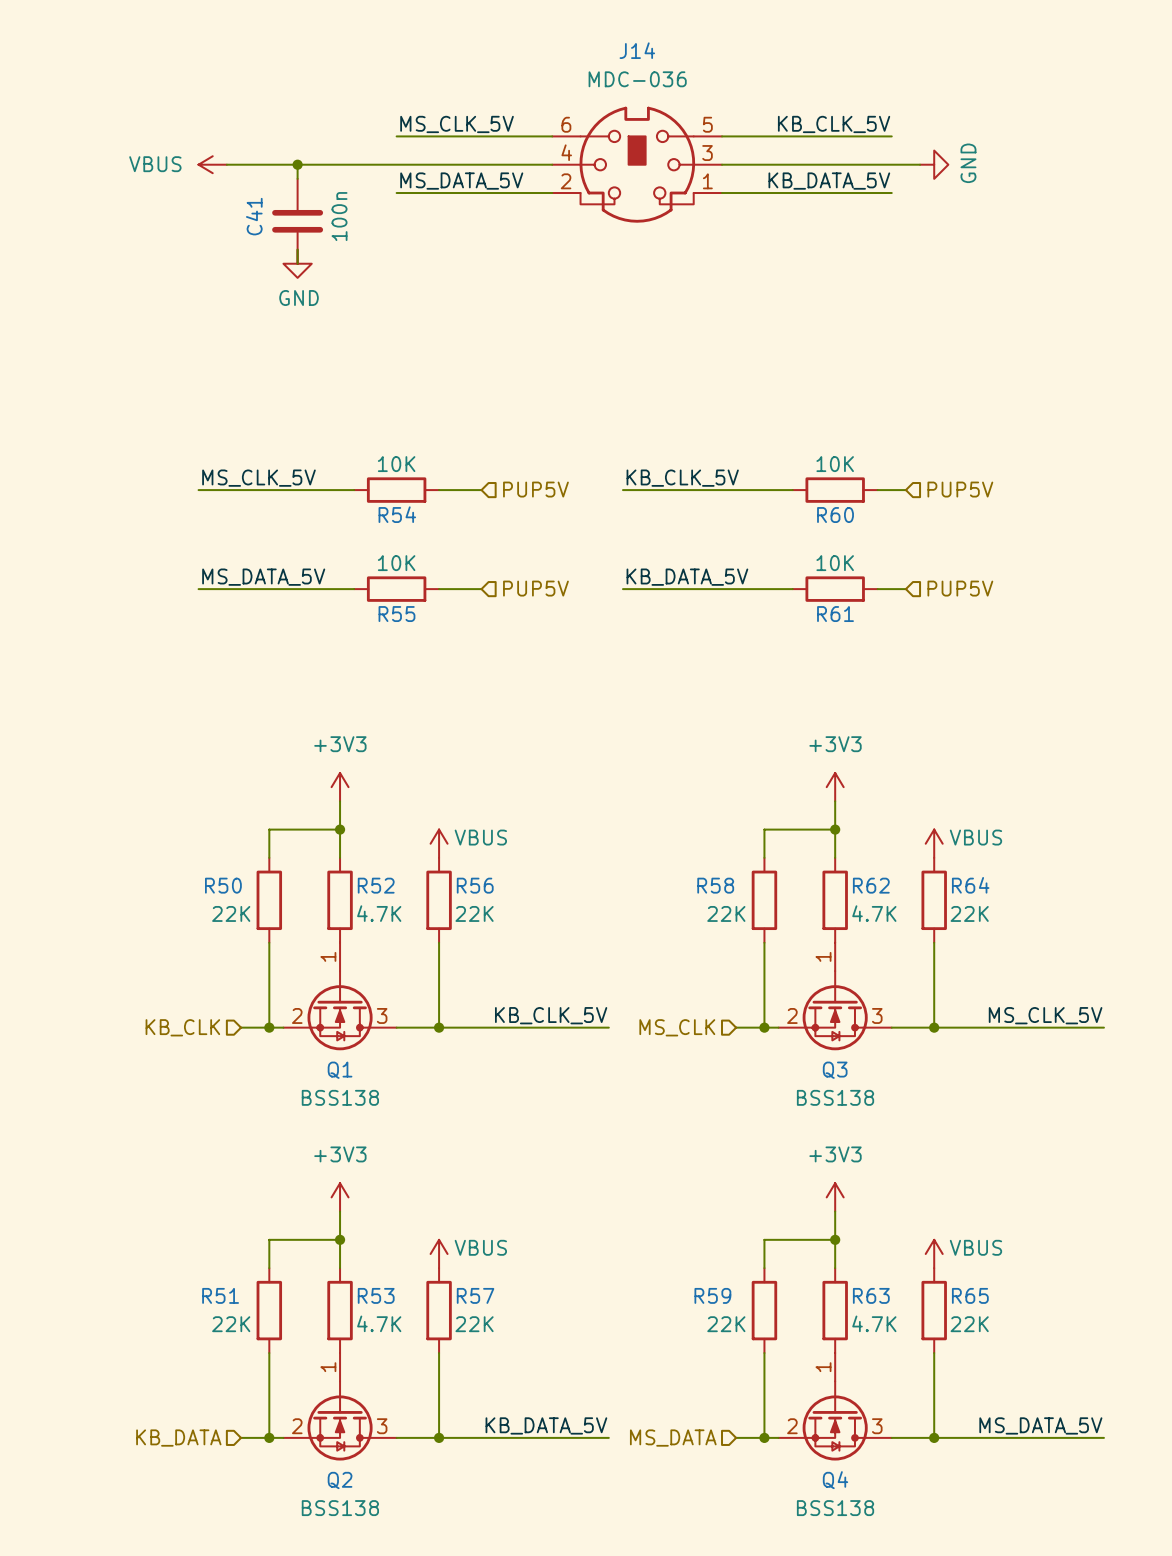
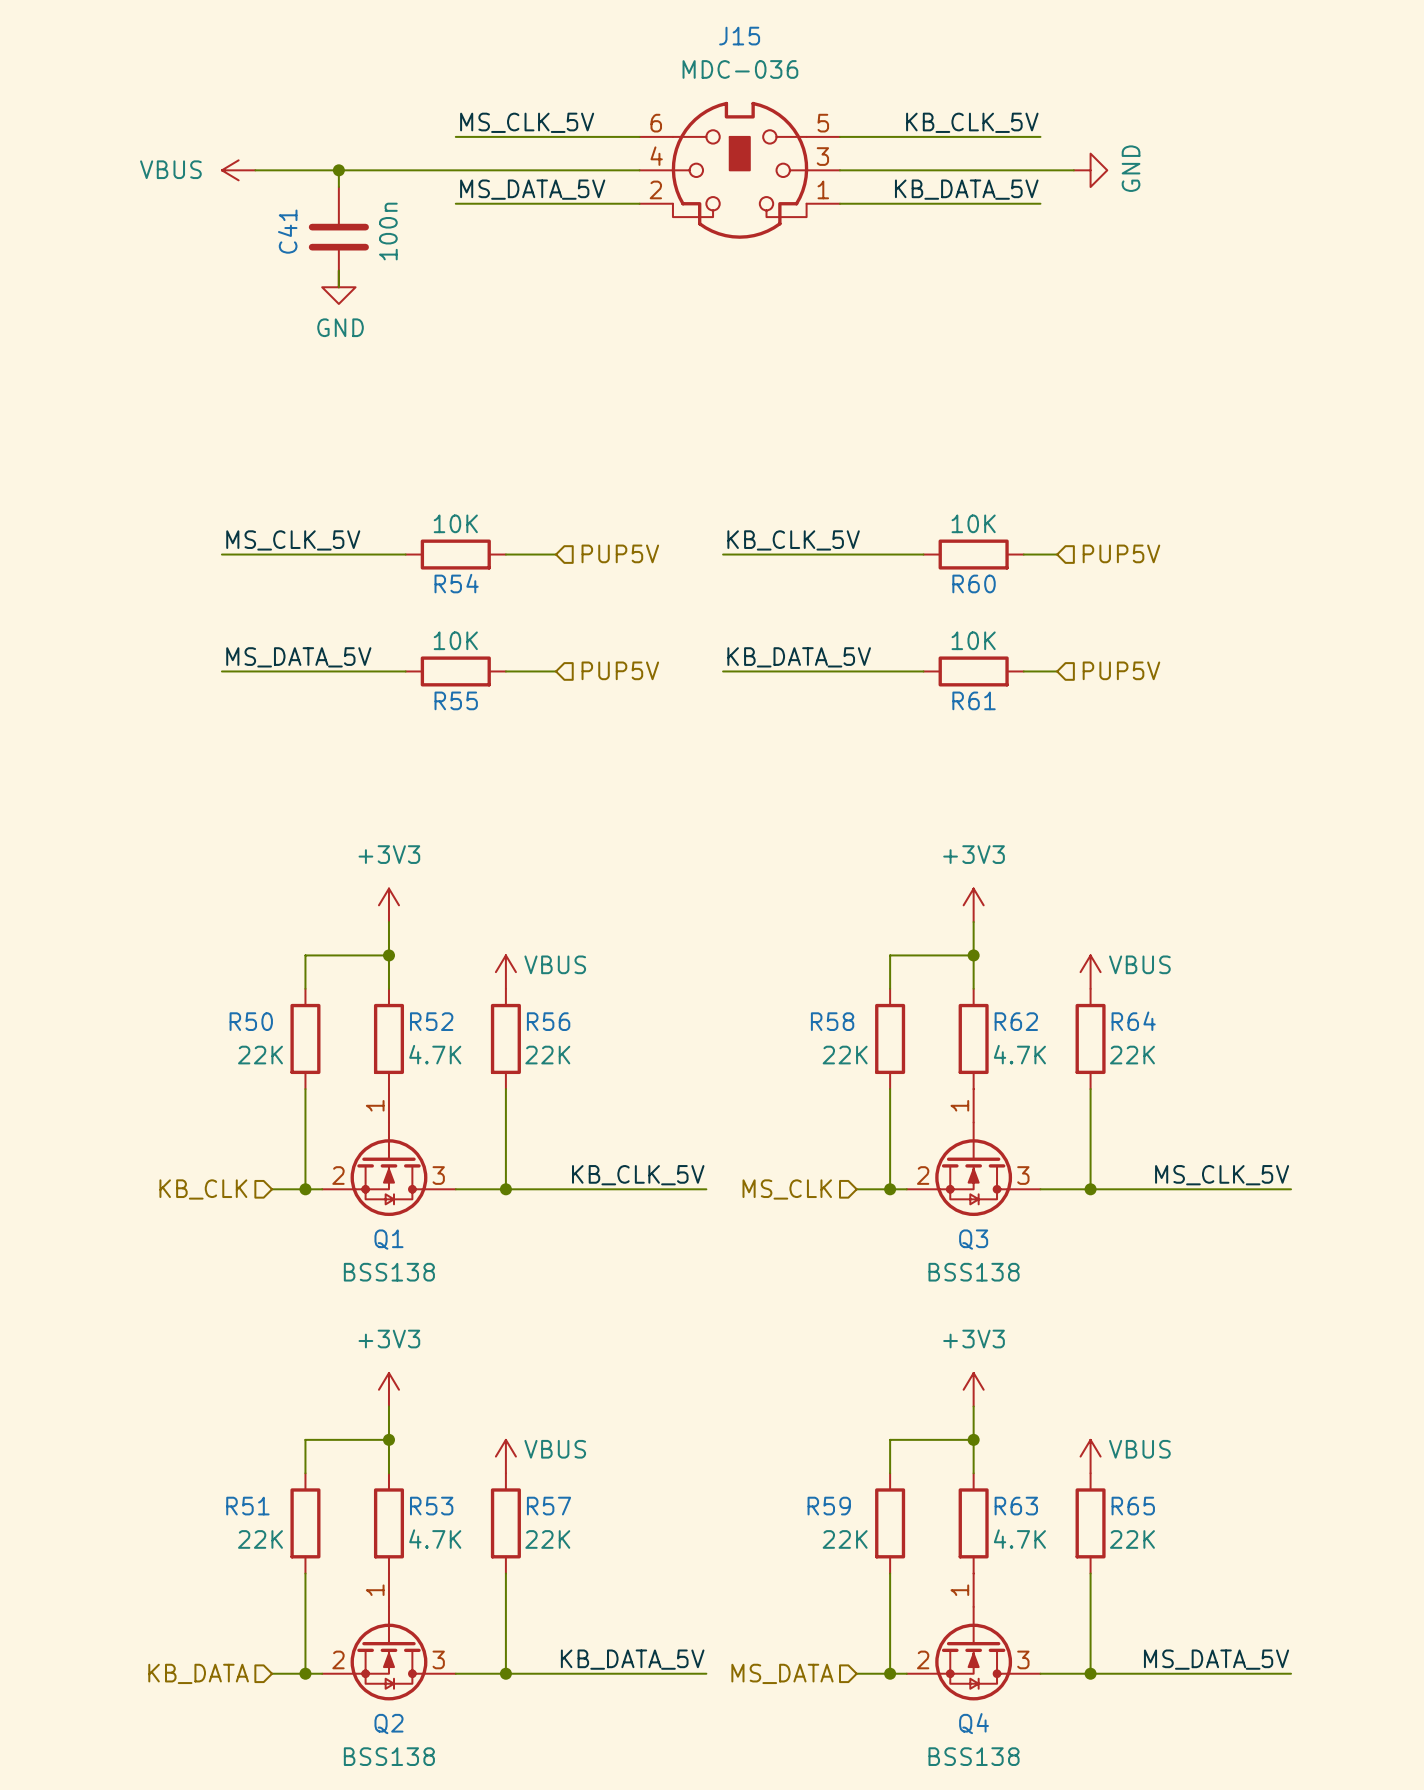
J14 name: J14 (637, 50) -> J15 (739, 36)

